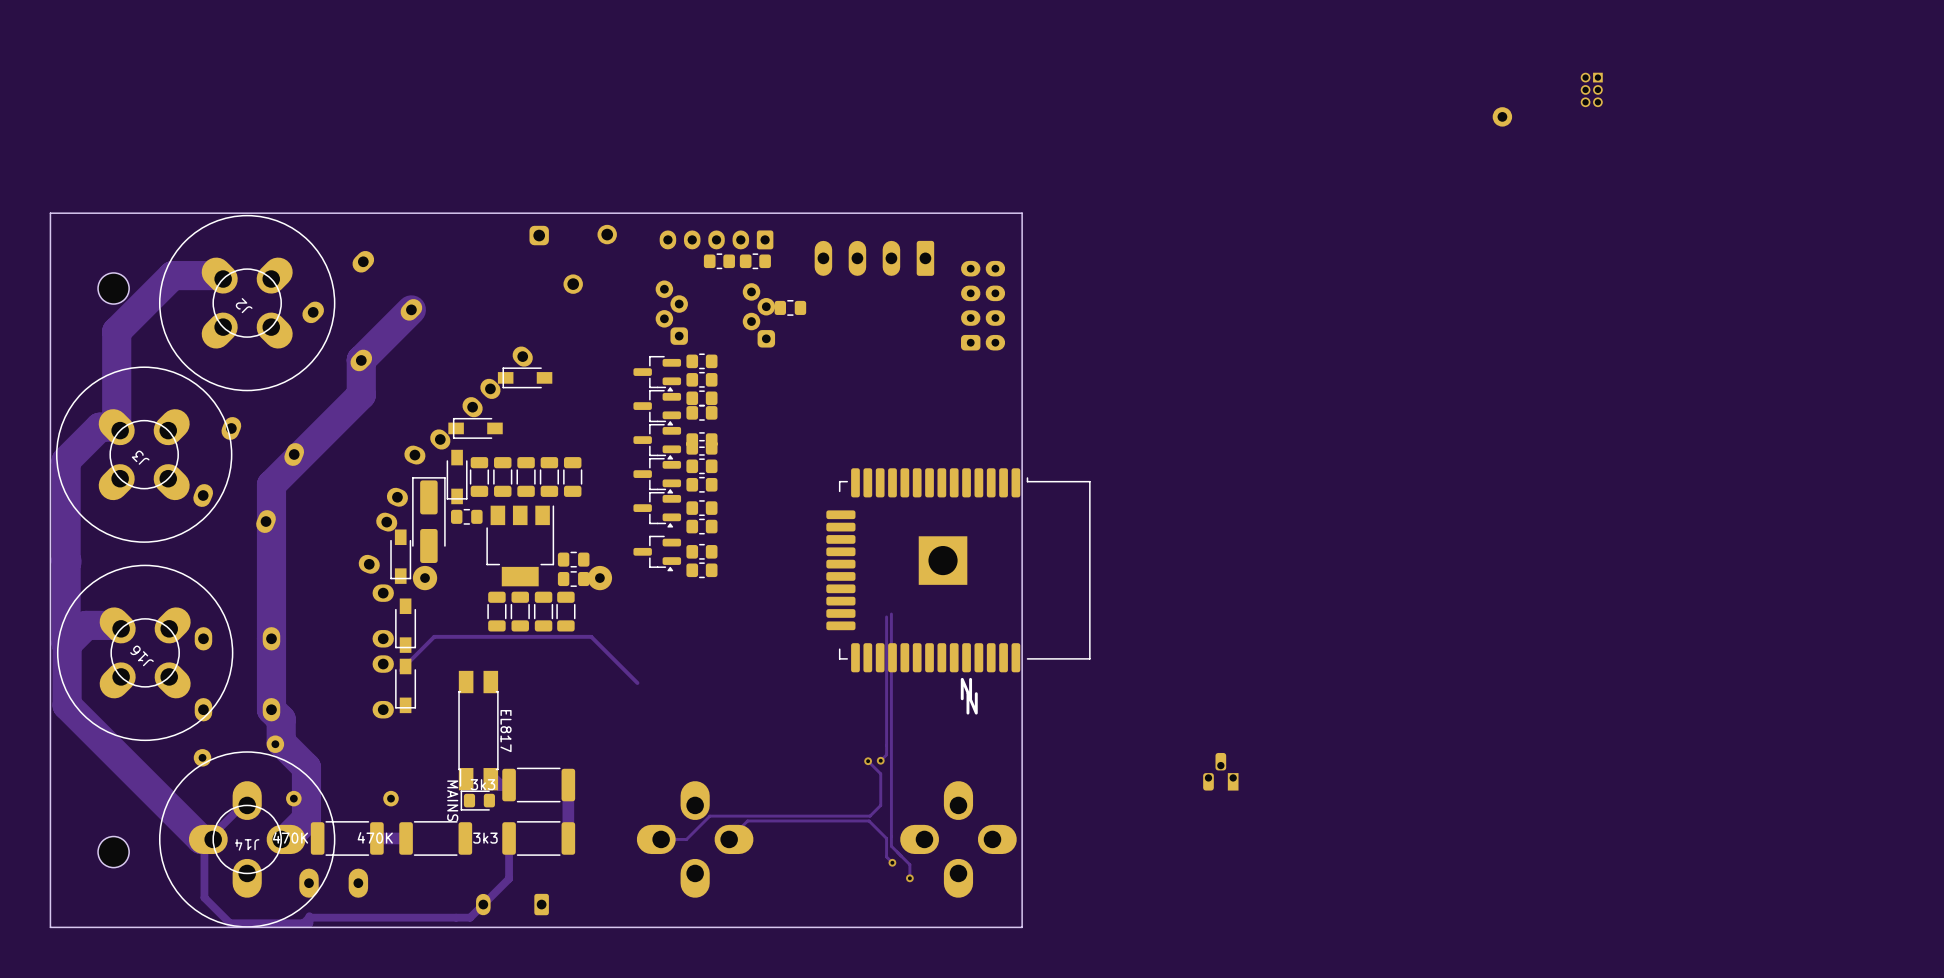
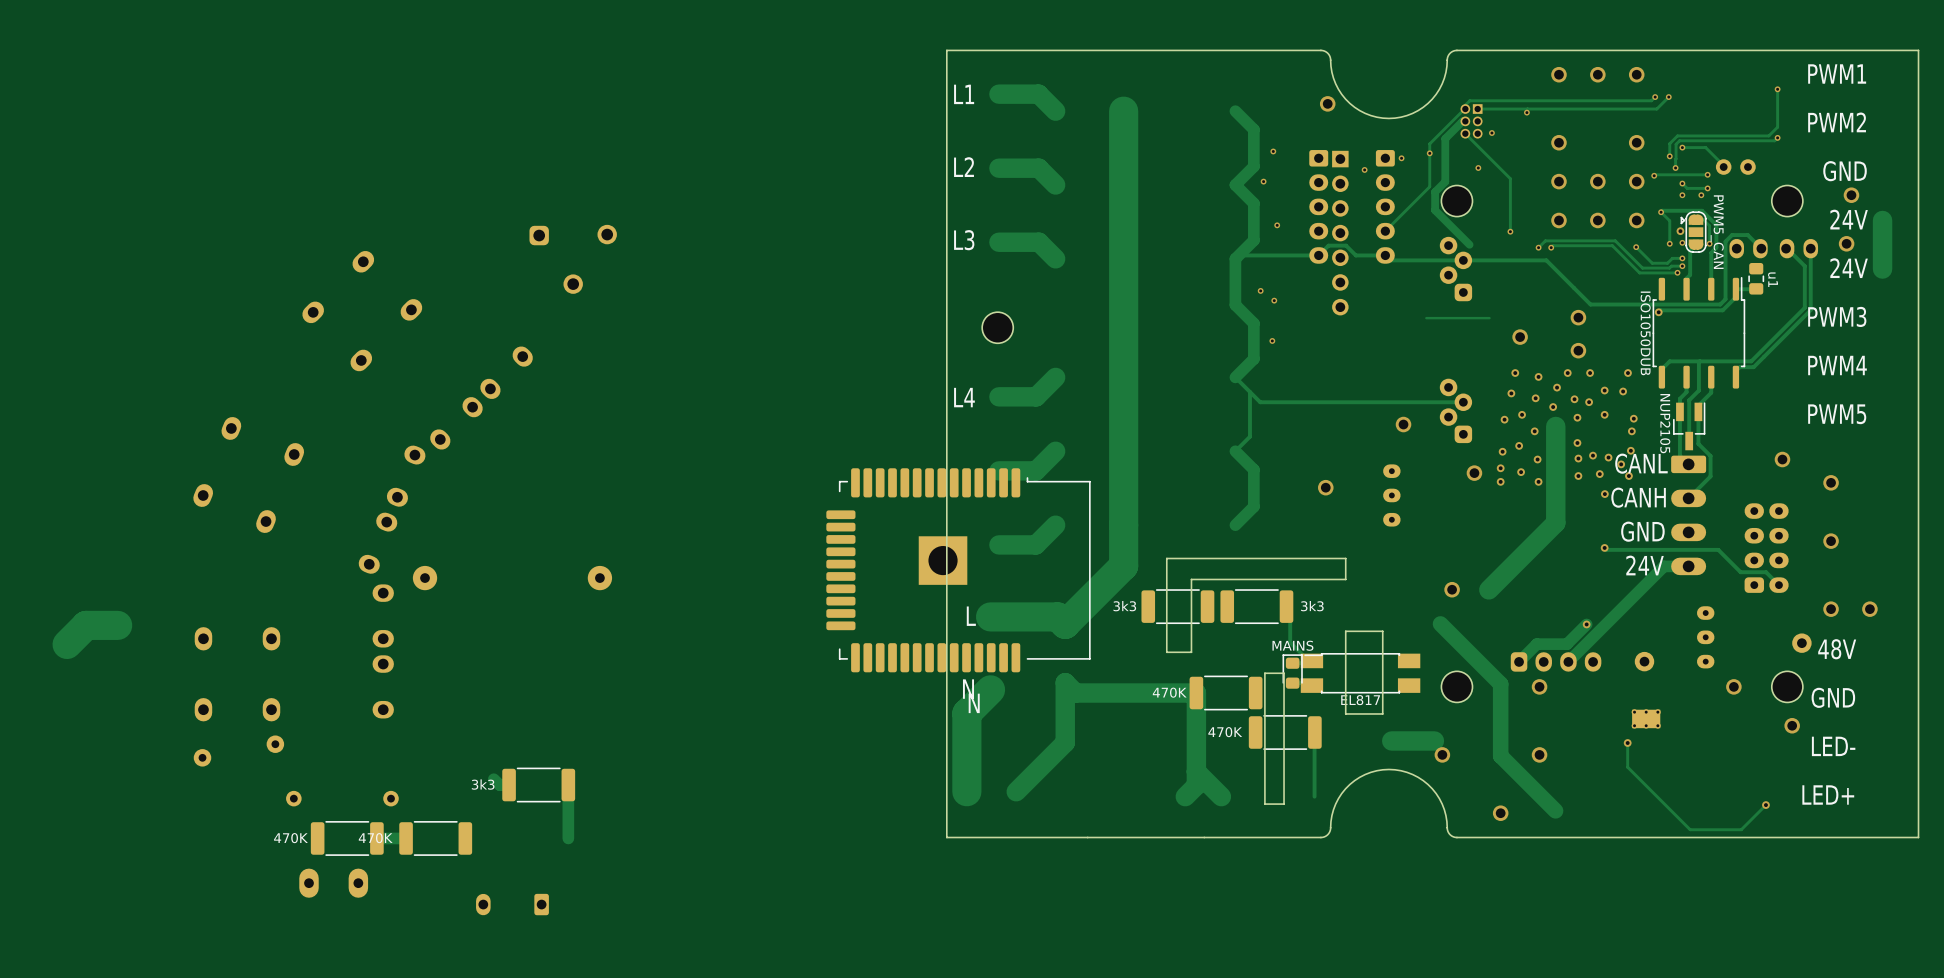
board edge: none -> (1918, 50) (1455, 50) (1448, 55) (1444, 78) (1432, 99) (1412, 113) (1388, 118) (1365, 113) (1345, 99) (1333, 78) (1329, 55) (1322, 50) (946, 50) (946, 837) (1322, 837) (1329, 832) (1333, 809) (1345, 788) (1365, 774) (1388, 769) (1412, 774) (1432, 788) (1444, 809) (1448, 832) (1455, 837) (1918, 837) (1918, 50)
text: none -> PWM1 (1837, 73)
via: none -> (1558, 74)
via: none -> (1597, 74)
via: none -> (1636, 74)
part position: (1591, 89) -> (1471, 121)
track: none -> (1777, 89) (1777, 127) (1768, 135) (1677, 135) (1669, 143) (1669, 156)
via: none -> (1777, 89)
text: none -> L1 (964, 94)
track: none -> (998, 94) (1038, 94) (1055, 111)
track: none -> (1655, 97) (1651, 100) (1469, 100) (1465, 105) (1465, 109)
via: none -> (1655, 97)
track: none -> (1668, 97) (1656, 109) (1477, 109)
via: none -> (1668, 97)
via: none -> (1327, 103)
track: none -> (1464, 109) (1429, 143) (1429, 186) (1385, 231)
track: none -> (1123, 111) (1123, 565) (1065, 624) (1057, 616) (990, 616)
via: none -> (1526, 112)
part: (1502, 116) -> none
track: none -> (1465, 121) (1462, 121) (1445, 138) (1445, 181) (1435, 191) (1435, 210) (1469, 244)
text: none -> PWM2 (1837, 122)
track: none -> (1465, 133) (1510, 178) (1510, 231)
via: none -> (1491, 133)
track: none -> (1777, 137) (1774, 140) (1679, 140) (1676, 144) (1675, 168)
via: none -> (1777, 137)
via: none -> (1558, 142)
via: none -> (1636, 142)
track: none -> (1682, 147) (1705, 147) (1723, 165)
via: none -> (1682, 147)
via: none -> (1273, 151)
via: none -> (1429, 153)
via: none -> (1669, 156)
via: none -> (1401, 158)
text: none -> L2 (964, 167)
part: none -> (1735, 167)
track: none -> (998, 168) (1038, 168) (1055, 185)
via: none -> (1478, 168)
via: none -> (1675, 168)
via: none -> (1364, 169)
text: none -> GND (1845, 171)
track: none -> (1707, 174) (1654, 175)
via: none -> (1707, 174)
via: none -> (1654, 175)
via: none -> (1263, 181)
via: none -> (1558, 181)
via: none -> (1597, 181)
via: none -> (1636, 181)
track: none -> (1682, 183) (1687, 188) (1707, 188)
via: none -> (1682, 183)
track: none -> (1235, 185) (1249, 170) (1249, 125) (1235, 111) (1253, 129) (1253, 166) (1235, 185)
track: none -> (1235, 185) (1253, 203) (1253, 240) (1235, 258)
via: none -> (1707, 188)
via: none -> (1682, 195)
via: none -> (1701, 195)
via: none -> (1851, 195)
part: none -> (1456, 201)
part: none -> (1787, 201)
part: none -> (1318, 206)
part: none -> (1385, 206)
via: none -> (1661, 212)
board edge: (1022, 213) (50, 213) (50, 927) (1022, 927) (1022, 213) -> none
track: none -> (1695, 219) (1703, 219) (1709, 225) (1709, 243)
text: none -> 24V (1849, 219)
via: none -> (1558, 220)
via: none -> (1597, 220)
via: none -> (1636, 220)
track: none -> (1882, 220) (1882, 269)
via: none -> (1277, 225)
via: none -> (1510, 231)
via: none -> (1680, 231)
part: none -> PWM5_CAN (1693, 232)
part: none -> (1340, 233)
part: (716, 239) -> none
text: none -> L3 (964, 240)
track: none -> (998, 242) (1039, 242) (1055, 258)
via: none -> (1682, 242)
track: none -> (1669, 243) (1669, 220) (1661, 212) (1662, 210) (1702, 210) (1716, 225) (1716, 247) (1711, 252) (1711, 289)
via: none -> (1669, 243)
via: none -> (1709, 243)
via: none -> (1846, 243)
track: none -> (1695, 244) (1690, 250) (1690, 274) (1686, 278) (1686, 289)
track: none -> (1538, 247) (1545, 240) (1615, 240) (1642, 268) (1682, 266)
via: none -> (1538, 247)
track: none -> (1551, 247) (1553, 245) (1612, 245) (1639, 272) (1677, 272)
via: none -> (1551, 247)
track: none -> (1636, 247) (1652, 263) (1667, 263) (1672, 258) (1682, 258)
via: none -> (1636, 247)
track: none -> (1761, 248) (1747, 235) (1732, 235) (1725, 241) (1725, 299) (1720, 304) (1590, 304) (1546, 260) (1390, 260)
part: none -> (1773, 248)
track: none -> (1786, 248) (1804, 266) (1804, 307) (1751, 361) (1669, 361) (1661, 369) (1661, 377)
track: none -> (1810, 248) (1810, 310) (1753, 367) (1739, 367) (1735, 370) (1735, 377)
track: none -> (1385, 255) (1355, 255) (1346, 245) (1328, 245) (1318, 255) (1238, 255)
part: (874, 258) -> none
track: none -> (1235, 258) (1235, 305) (1253, 323) (1253, 358) (1235, 377) (1260, 402) (1464, 402)
via: none -> (1682, 258)
part: (719, 261) -> none
part: (755, 261) -> none
via: none -> (1682, 266)
text: none -> 24V (1849, 268)
part: none -> (1455, 269)
via: none -> (1677, 272)
track: (219, 275) (172, 275) (116, 331) (116, 427) (99, 427) (66, 460) (67, 705) (201, 839) (208, 839) -> none
part: none -> u1 (1756, 278)
part: (113, 288) -> none
track: none -> (1756, 288) (1735, 289) (1735, 297) (1722, 310) (1660, 310) (1658, 312)
via: none -> (1260, 290)
via: none -> (1274, 300)
J2: (247, 303) -> none
part: (983, 305) -> none
part: (790, 307) -> none
track: (411, 309) (361, 360) (361, 394) (271, 484) (271, 709) (281, 719) (281, 742) (306, 767) (306, 819) (286, 839) -> none
part: (671, 312) -> none
via: none -> (1658, 312)
part: (758, 315) -> none
text: none -> PWM3 (1837, 316)
via: none -> (1578, 317)
track: none -> (1489, 318) (1426, 318)
part: none -> (997, 327)
part: none -> ISO1050DUB (1698, 332)
via: none -> (1520, 337)
via: none -> (1272, 340)
via: none -> (1578, 350)
part: (701, 361) -> none
track: none -> (1699, 361) (1698, 390) (1689, 400) (1689, 441)
text: none -> PWM4 (1837, 365)
part: (657, 373) -> none
via: none -> (1515, 373)
via: none -> (1567, 373)
via: none -> (1590, 373)
via: none -> (1627, 373)
via: none -> (1538, 376)
part: (525, 377) -> none
track: none -> (1055, 377) (1036, 396) (998, 396)
track: none -> (1686, 377) (1686, 392) (1679, 398) (1679, 455) (1688, 464)
track: none -> (1711, 377) (1711, 392) (1698, 405) (1698, 443) (1710, 456) (1710, 476) (1688, 498)
part: (701, 379) -> none
via: none -> (1557, 387)
via: none -> (1604, 390)
track: none -> (1249, 391) (1249, 436) (1235, 451) (1253, 469) (1253, 506) (1235, 525)
via: none -> (1623, 391)
via: none -> (1511, 393)
text: none -> L4 (964, 397)
part: (701, 398) -> none
via: none -> (1535, 398)
via: none -> (1574, 399)
via: none -> (1589, 402)
part: (657, 407) -> none
via: none -> (1553, 407)
part: none -> (1455, 410)
part: (701, 412) -> none
via: none -> (1522, 414)
via: none -> (1604, 414)
text: none -> PWM5 (1837, 414)
via: none -> (1577, 417)
via: none -> (1633, 418)
via: none -> (1504, 419)
via: none -> (1403, 424)
track: none -> (1555, 426) (1555, 522) (1488, 589)
part: none -> NUP2105 (1689, 426)
part: (475, 428) -> none
via: none -> (1534, 431)
via: none -> (1631, 431)
part: (701, 440) -> none
part: (657, 441) -> none
via: none -> (1577, 442)
via: none -> (1519, 445)
part: (701, 447) -> none
via: none -> (1630, 450)
track: none -> (1055, 451) (1036, 470) (998, 470)
via: none -> (1502, 451)
J3: (144, 454) -> none
via: none -> (1592, 455)
via: none -> (1608, 457)
via: none -> (1578, 458)
via: none -> (1537, 459)
via: none -> (1782, 459)
text: none -> CANL (1641, 463)
via: none -> (1621, 464)
part: (701, 466) -> none
via: none -> (1500, 468)
via: none -> (1521, 472)
via: none -> (1474, 473)
via: none -> (1599, 474)
part: (657, 475) -> none
via: none -> (1578, 476)
via: none -> (1628, 476)
part: (457, 477) -> none
part: (479, 477) -> none
part: (502, 477) -> none
part: (526, 477) -> none
part: (549, 477) -> none
part: (572, 477) -> none
via: none -> (1500, 481)
via: none -> (1538, 481)
via: none -> (1831, 482)
part: (701, 484) -> none
via: none -> (1325, 487)
via: none -> (1604, 494)
part: none -> (1391, 495)
text: none -> CANH (1638, 497)
part: (701, 508) -> none
part: (657, 509) -> none
part: none -> (1688, 515)
part: (466, 516) -> none
part: (428, 520) -> none
track: none -> (1055, 525) (1035, 544) (998, 544)
part: (701, 526) -> none
text: none -> GND (1642, 531)
via: none -> (1831, 541)
part: (520, 545) -> none
track: none -> (1604, 547) (1606, 549) (1718, 549) (1740, 572) (1766, 572) (1778, 585)
via: none -> (1604, 547)
part: none -> (1766, 548)
part: (701, 551) -> none
part: (657, 553) -> none
part: (400, 556) -> none
board edge: none -> (1345, 558) (1166, 558) (1166, 652) (1191, 652) (1191, 579) (1345, 579) (1345, 558)
part: (573, 559) -> none
text: none -> 24V (1645, 565)
track: none -> (1688, 566) (1663, 566) (1568, 661)
part: (701, 570) -> none
part: (573, 579) -> none
via: none -> (1452, 589)
part: none -> 3k3 (1177, 606)
part: none -> 3k3 (1256, 606)
via: none -> (1831, 609)
via: none -> (1869, 609)
track: none -> (1290, 610) (1290, 642) (1308, 660)
part: (496, 611) -> none
part: (520, 611) -> none
part: (543, 611) -> none
part: (565, 611) -> none
track: (891, 614) (891, 846) (909, 864) (909, 878) -> none
track: (886, 616) (886, 754) (880, 760) -> none
text: none -> L (971, 616)
track: none -> (1440, 623) (1500, 684) (1500, 755) (1555, 810)
track: none -> (1586, 624) (1566, 644) (1536, 644) (1519, 661)
via: none -> (1586, 624)
part: (405, 625) -> none
board edge: none -> (1382, 631) (1345, 631) (1345, 713) (1382, 713) (1382, 631)
part: none -> (1705, 637)
part: none -> (1801, 643)
text: none -> 48V (1837, 649)
J16: (145, 652) -> none
part: none -> (1556, 661)
part: none -> (1644, 661)
track: (400, 670) (434, 636) (591, 636) (637, 683) -> none
part: none -> MAINS (1292, 671)
board edge: none -> (1284, 673) (1264, 673) (1264, 804) (1284, 804) (1284, 673)
part: none -> EL817 (1360, 673)
part: (405, 685) -> none
part: none -> (1456, 686)
via: none -> (1539, 686)
via: none -> (1733, 686)
part: none -> (1787, 686)
track: none -> (990, 689) (966, 713) (966, 791)
part: none -> 470K (1226, 693)
text: none -> GND (1833, 697)
part: none -> (1646, 718)
via: none -> (1792, 725)
part: EL817 (478, 730) -> none
part: none -> 470K (1285, 732)
track: none -> (1314, 732) (1314, 796)
track: none -> (1434, 740) (1391, 740)
track: none -> (1627, 743) (1627, 767) (1690, 829) (1741, 829) (1765, 805)
via: none -> (1627, 743)
text: none -> LED- (1833, 746)
via: none -> (1442, 754)
via: none -> (1539, 754)
via: (880, 760) -> none
track: (868, 761) (880, 773) (880, 805) (870, 816) (709, 816) (686, 839) (661, 839) -> none
via: (868, 761) -> none
track: none -> (1196, 771) (1221, 796)
part: (1220, 771) -> none
track: none -> (1016, 791) (1065, 742) (1065, 682) (1075, 693) (1196, 693) (1196, 785) (1185, 796)
text: none -> LED+ (1828, 794)
track: (247, 800) (204, 843) (204, 897) (229, 923) (309, 923) (309, 916) -> none
part: MAINS (477, 800) -> none
via: none -> (1765, 805)
via: none -> (1500, 813)
track: (509, 838) (509, 878) (470, 917) (309, 917) (303, 923) -> none
part: 3k3 (538, 838) -> none
J14: (247, 839) -> none
part: (695, 839) -> none
track: (729, 839) (747, 820) (869, 820) (886, 838) (886, 856) (892, 862) -> none
part: (958, 839) -> none
part: (113, 852) -> none
via: (892, 862) -> none
via: (909, 878) -> none

